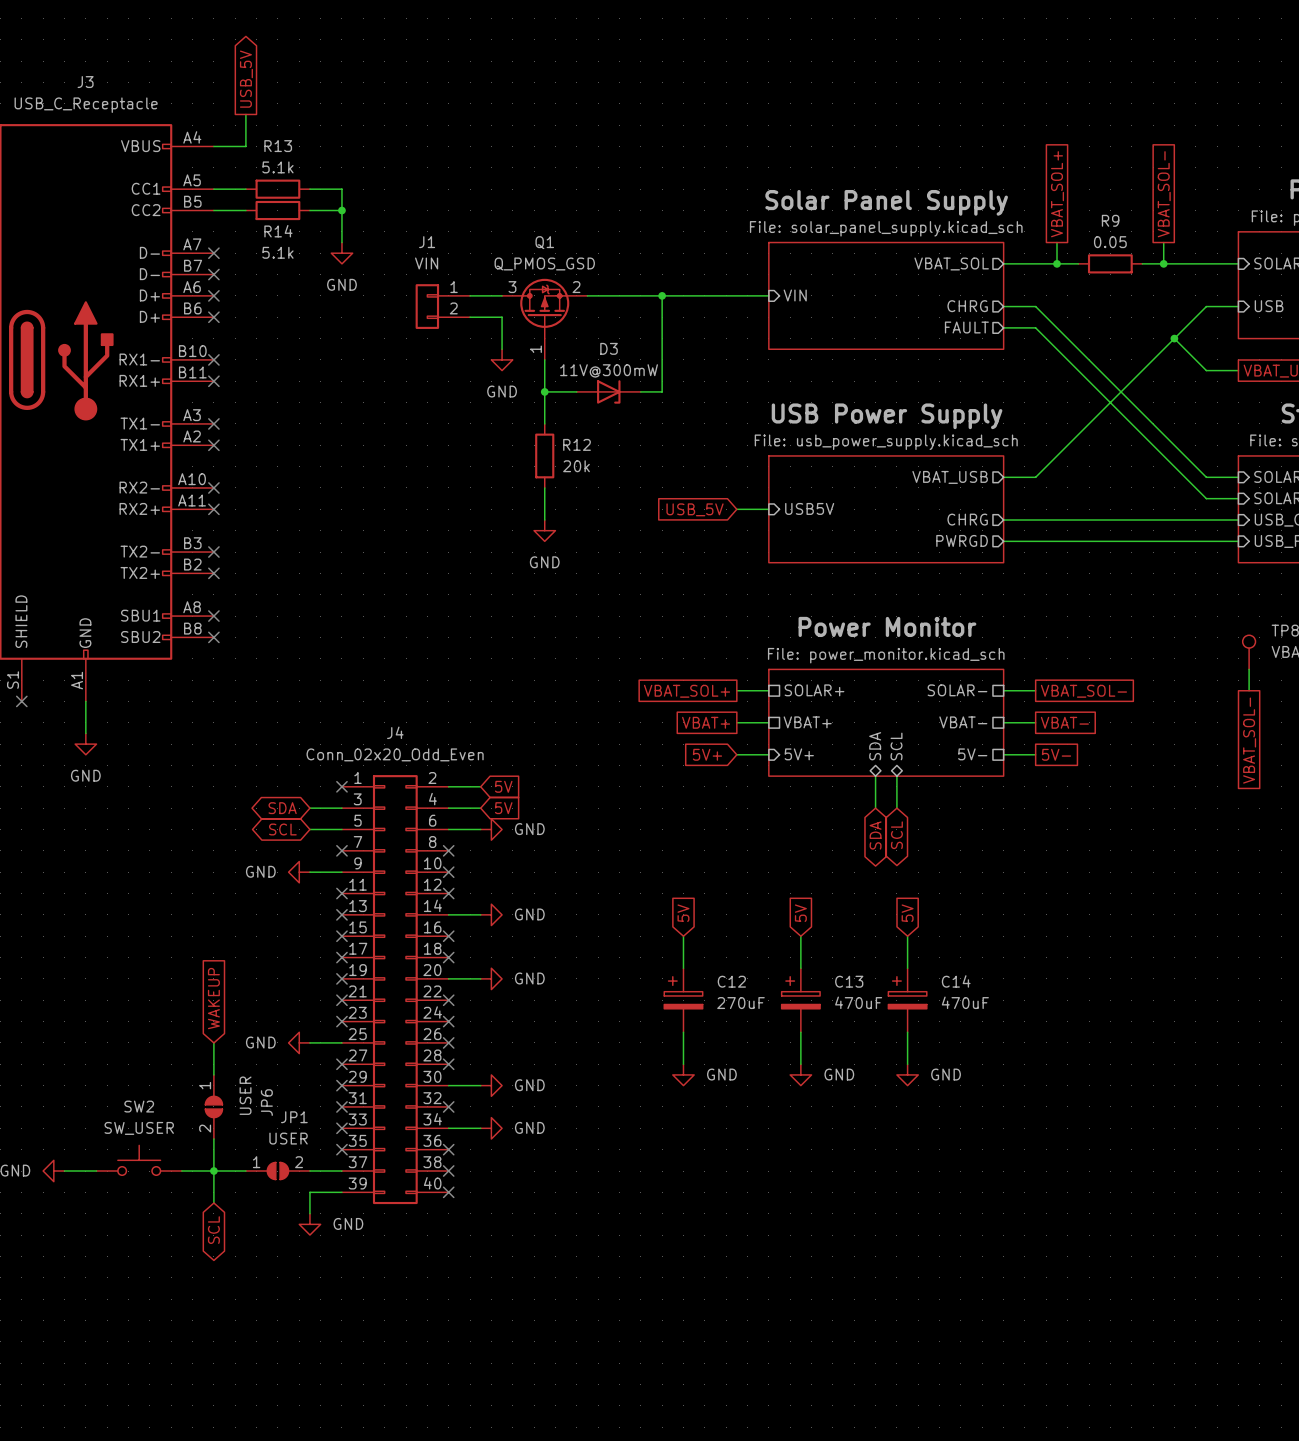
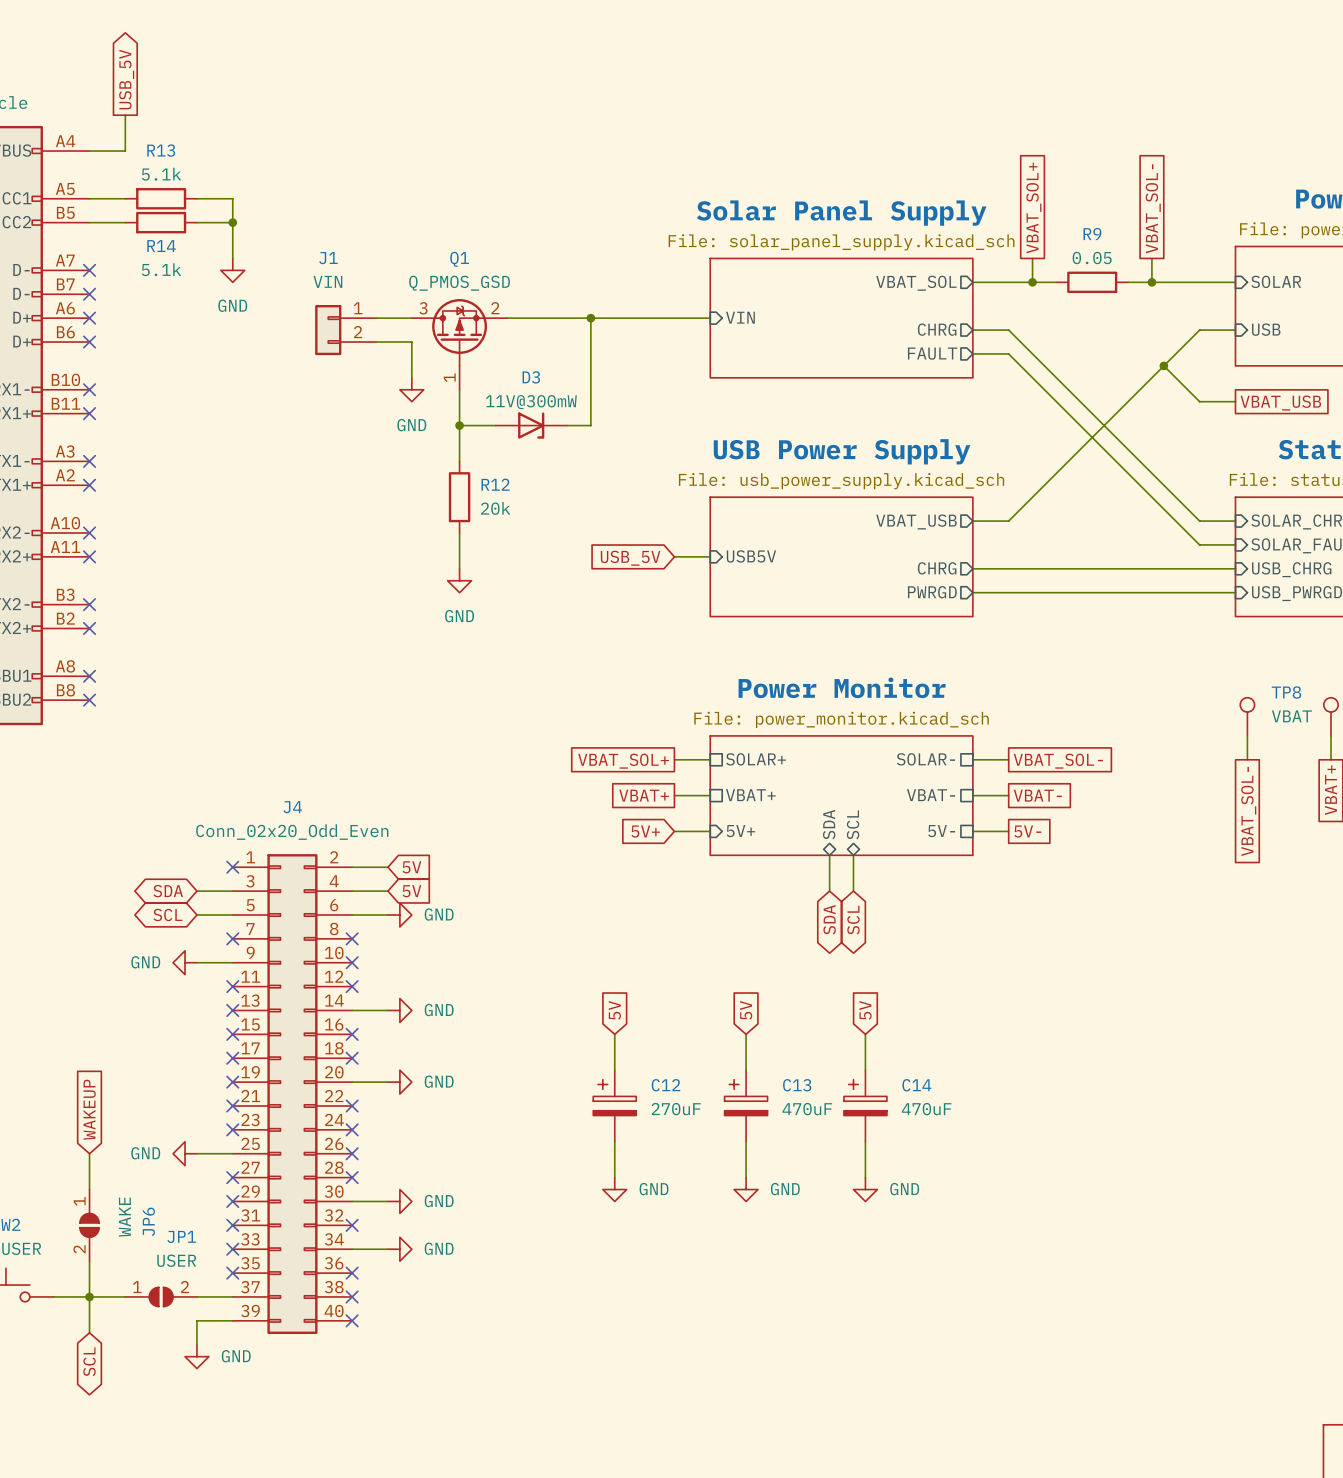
JP6 value: USER (245, 1095) -> WAKE (124, 1217)

